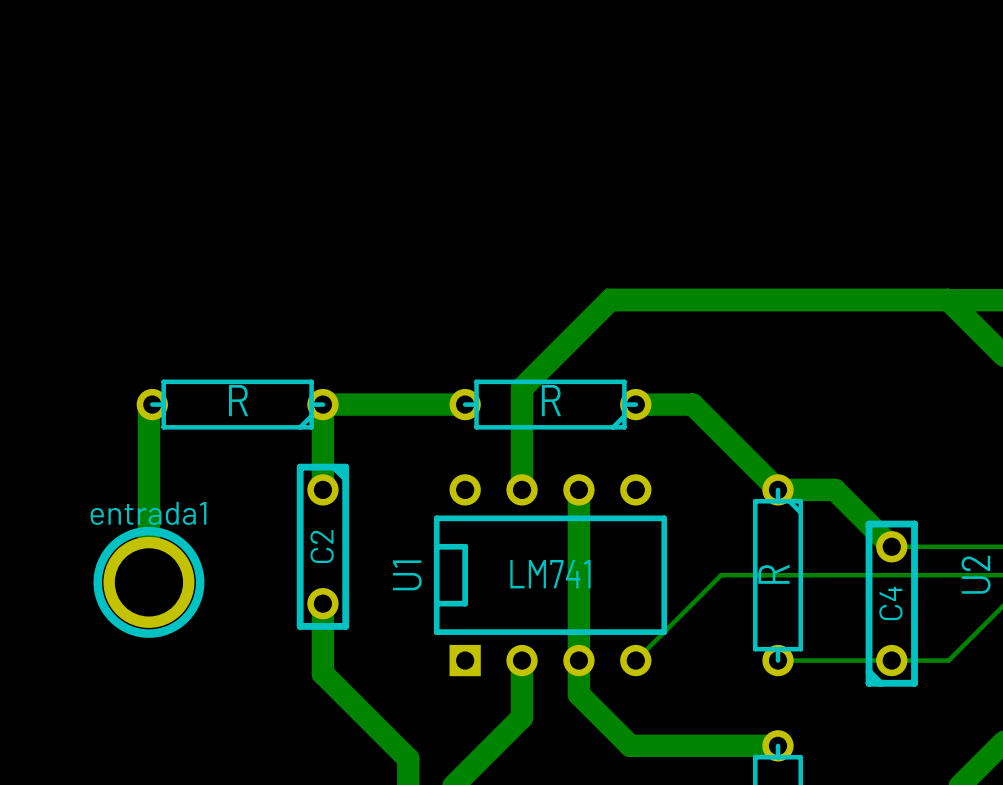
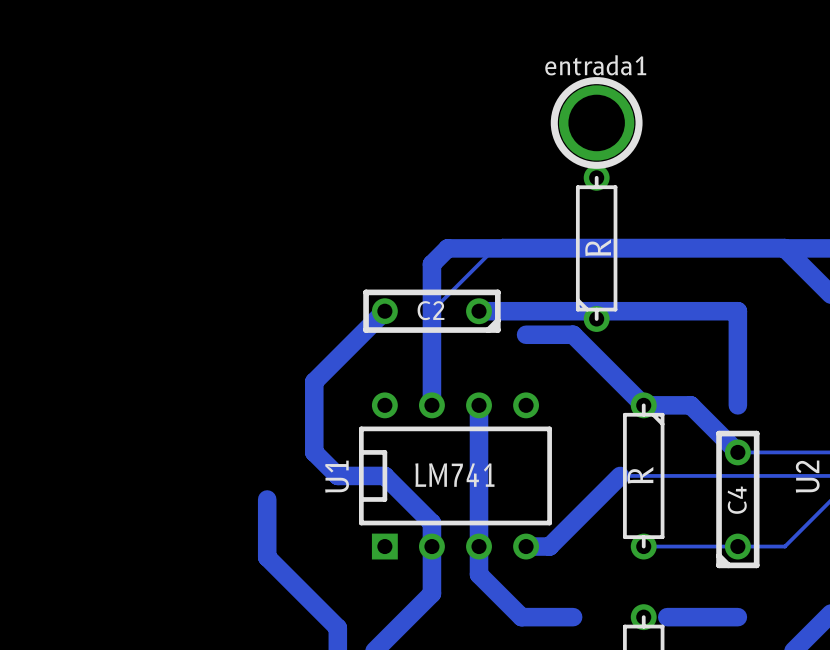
bottom track: (610, 300) (522, 388) (522, 489) -> (504, 248) (447, 248) (431, 264) (431, 311)
bottom track: none -> (384, 311) (314, 381) (314, 452) (337, 475) (384, 475) (431, 523) (431, 546)
bottom track: none -> (479, 311) (737, 311) (737, 405)
part: R (237, 404) -> none
bottom track: (465, 404) (322, 404) (322, 489) -> none
part rotation: 0° (550, 404) -> 90° clockwise (596, 248)
part position: (550, 404) -> (596, 248)
bottom track: (148, 407) (148, 582) -> none
C2 rotation: 0° (322, 546) -> 90° clockwise (431, 311)
C2 position: (322, 546) -> (431, 311)
bottom track: (749, 575) (721, 575) (635, 660) -> (620, 475) (549, 546) (526, 546)
entrada1 position: (148, 582) -> (596, 122)
bottom track: (692, 745) (778, 745) -> (667, 617) (737, 617)

